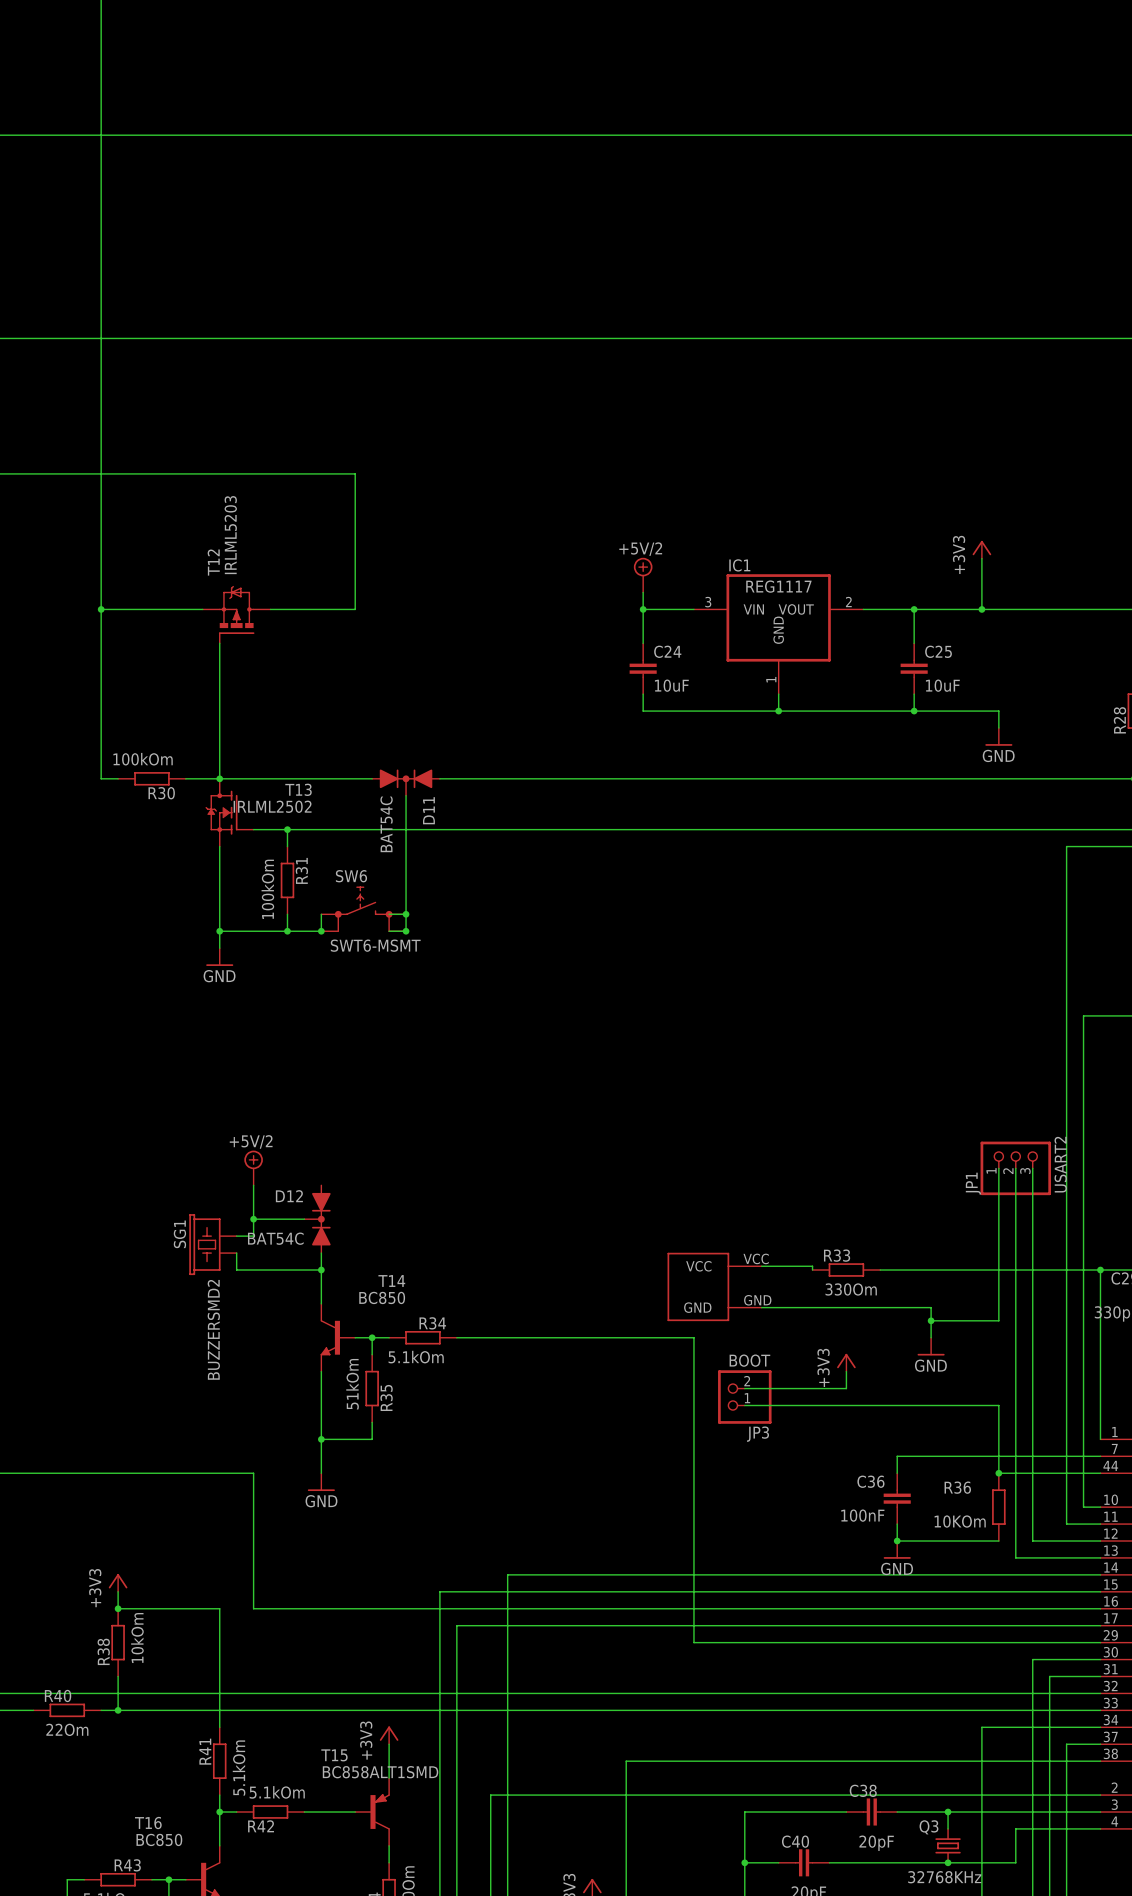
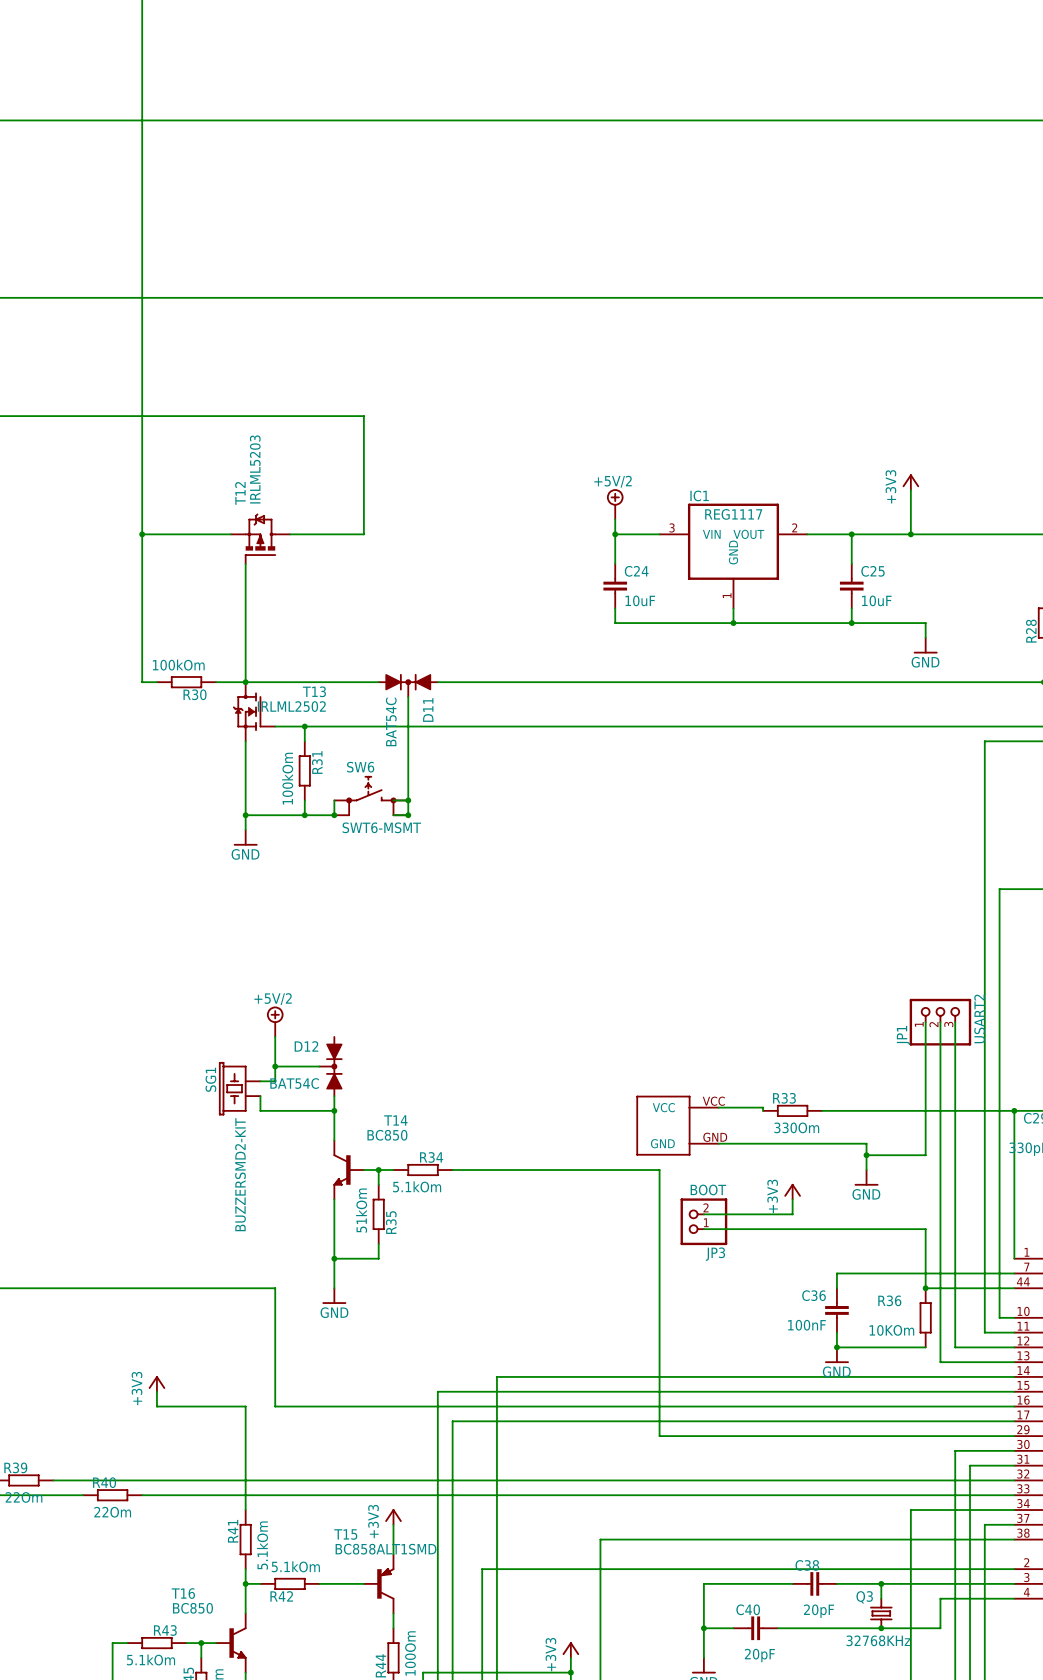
SG1 value: BUZZERSMD2 (213, 1329) -> BUZZERSMD2-KIT (240, 1174)
junction: (118, 1608) -> none
R38: 10kOm (118, 1642) -> none
wire: (118, 1676) (118, 1710) -> none
junction: (118, 1710) -> none

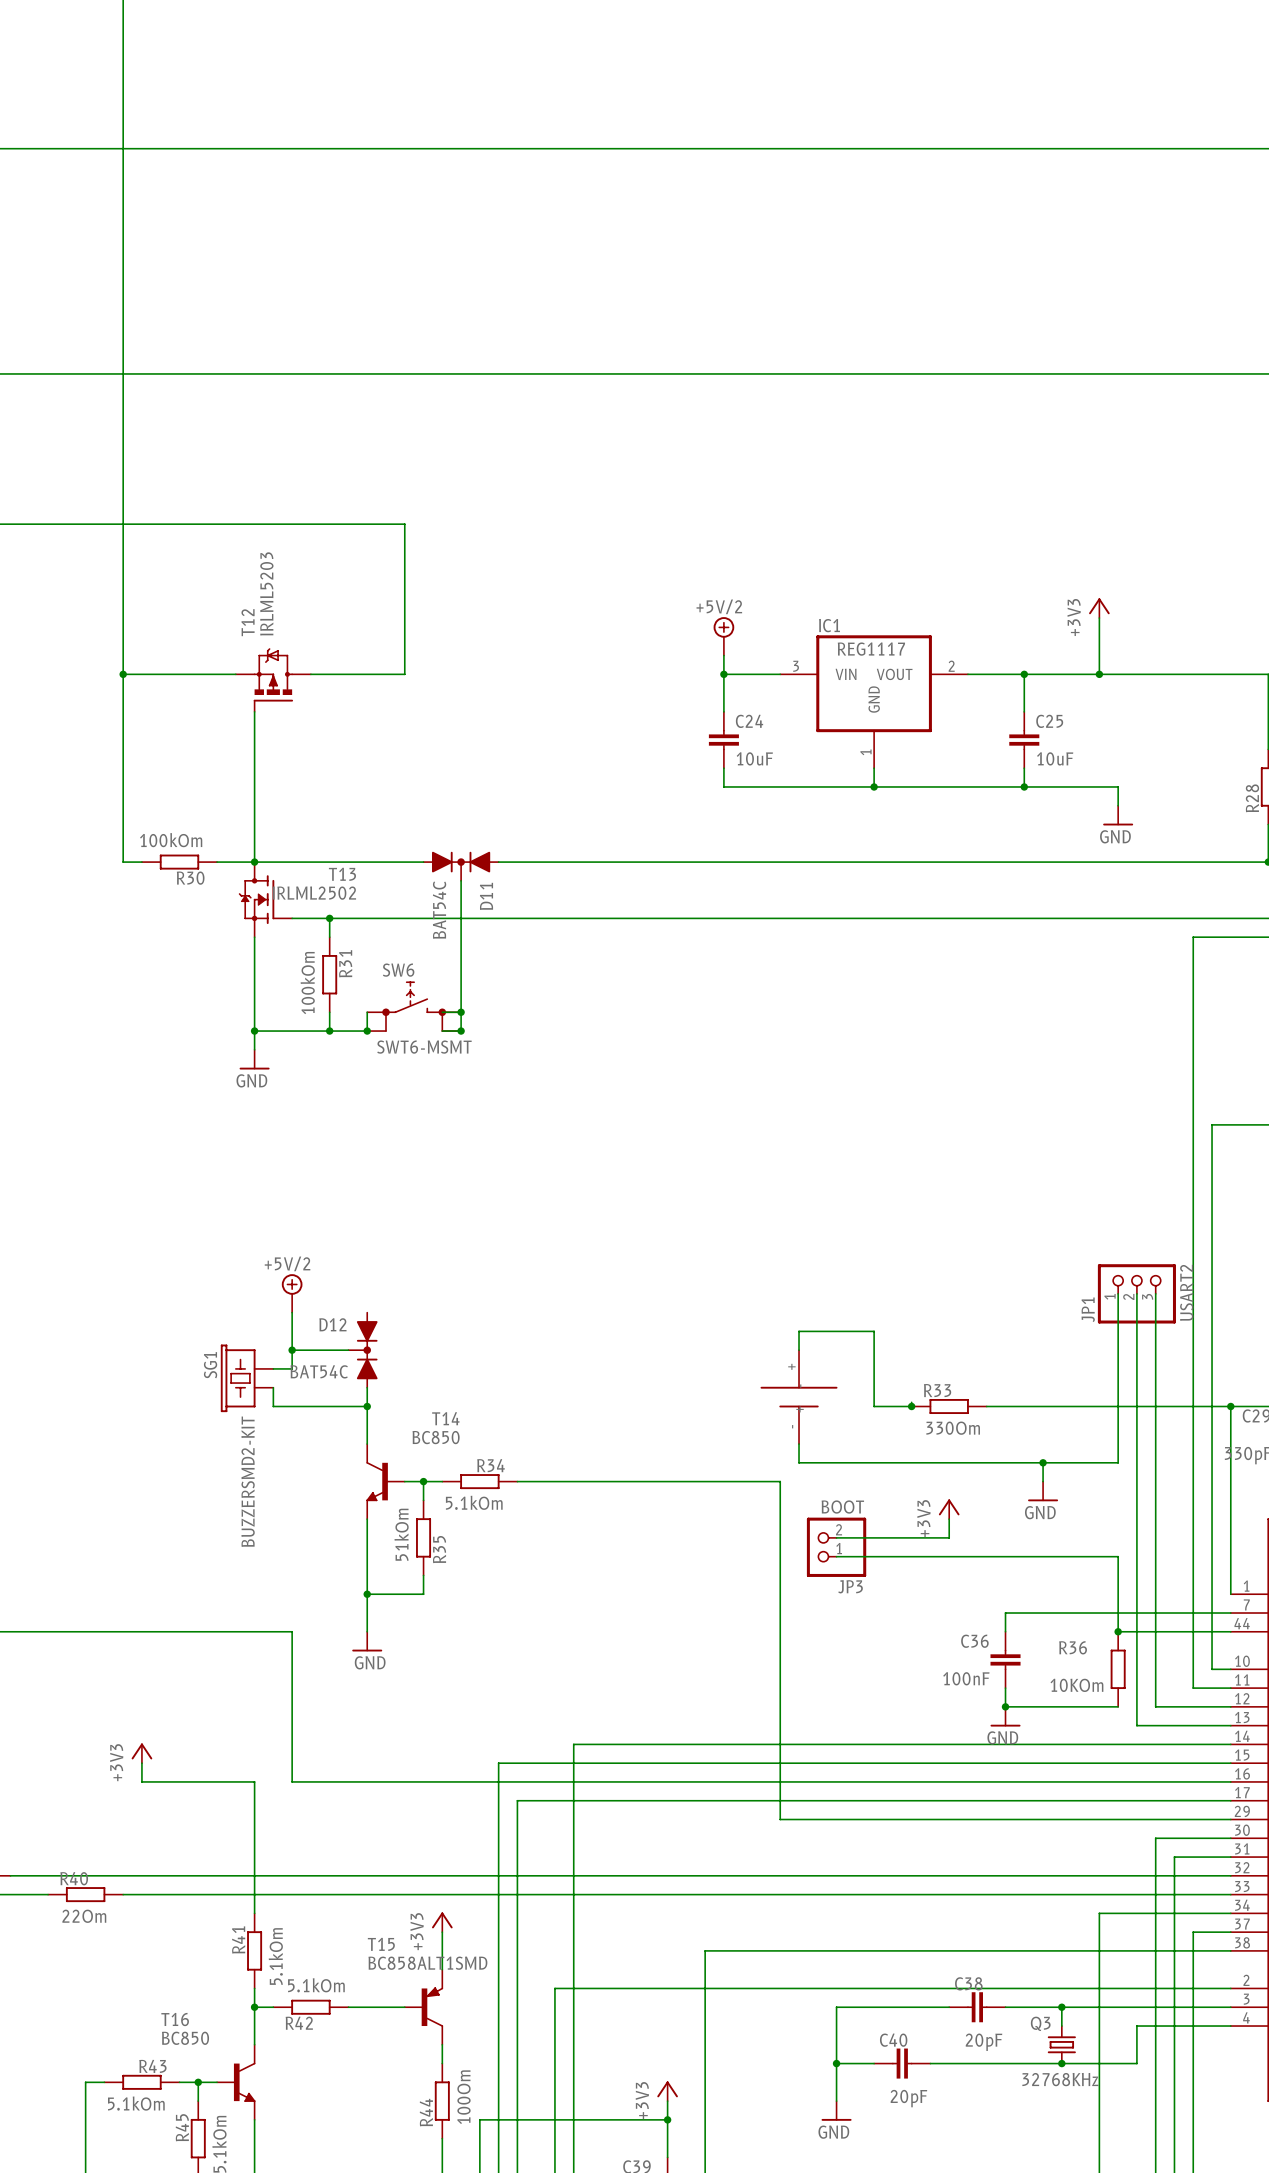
wire: none -> (799, 1350) (799, 1331) (874, 1331) (874, 1406) (911, 1406)
part: none -> (799, 1397)
wire: (718, 1107) (763, 1107) -> none
junction: none -> (911, 1406)
part: (677, 1125) -> none
wire: (718, 1143) (866, 1143) (866, 1155) -> (799, 1444) (799, 1462) (1043, 1462)

